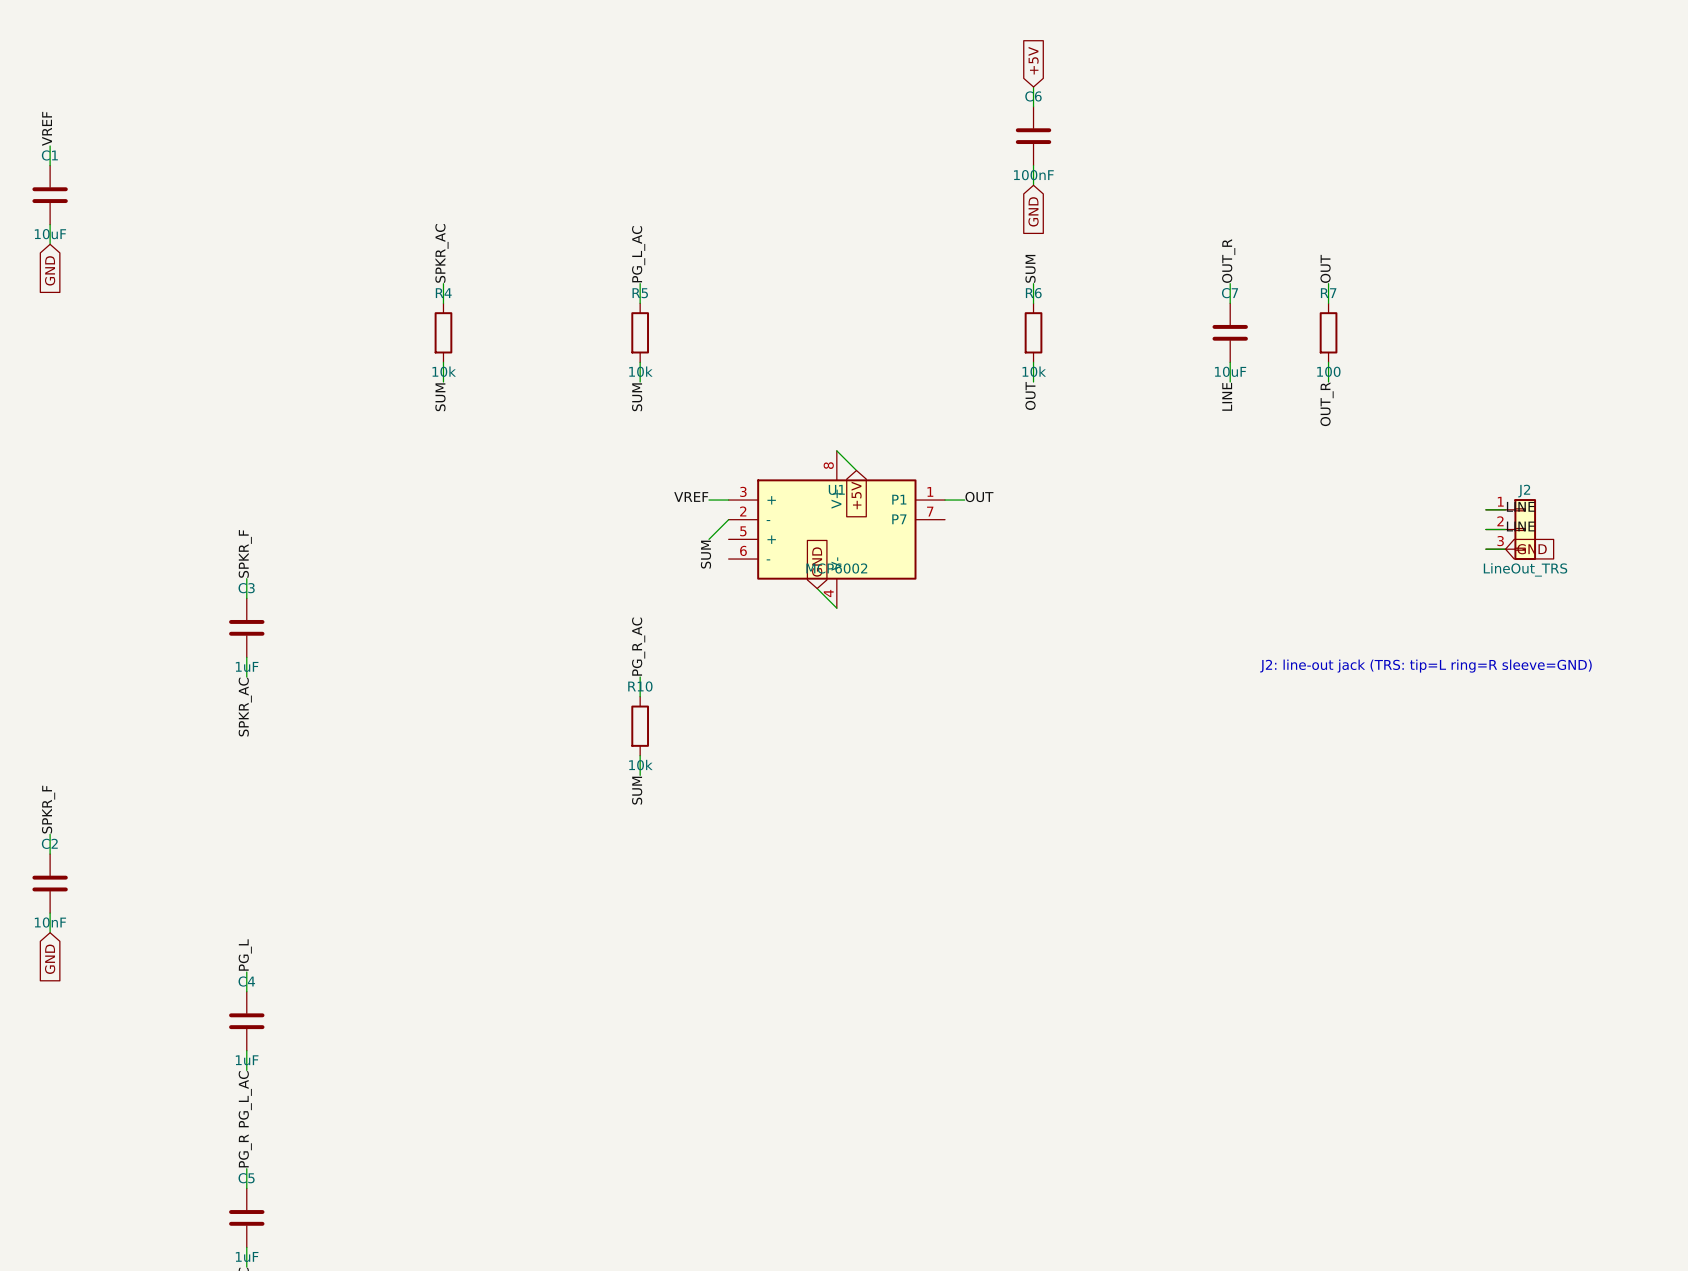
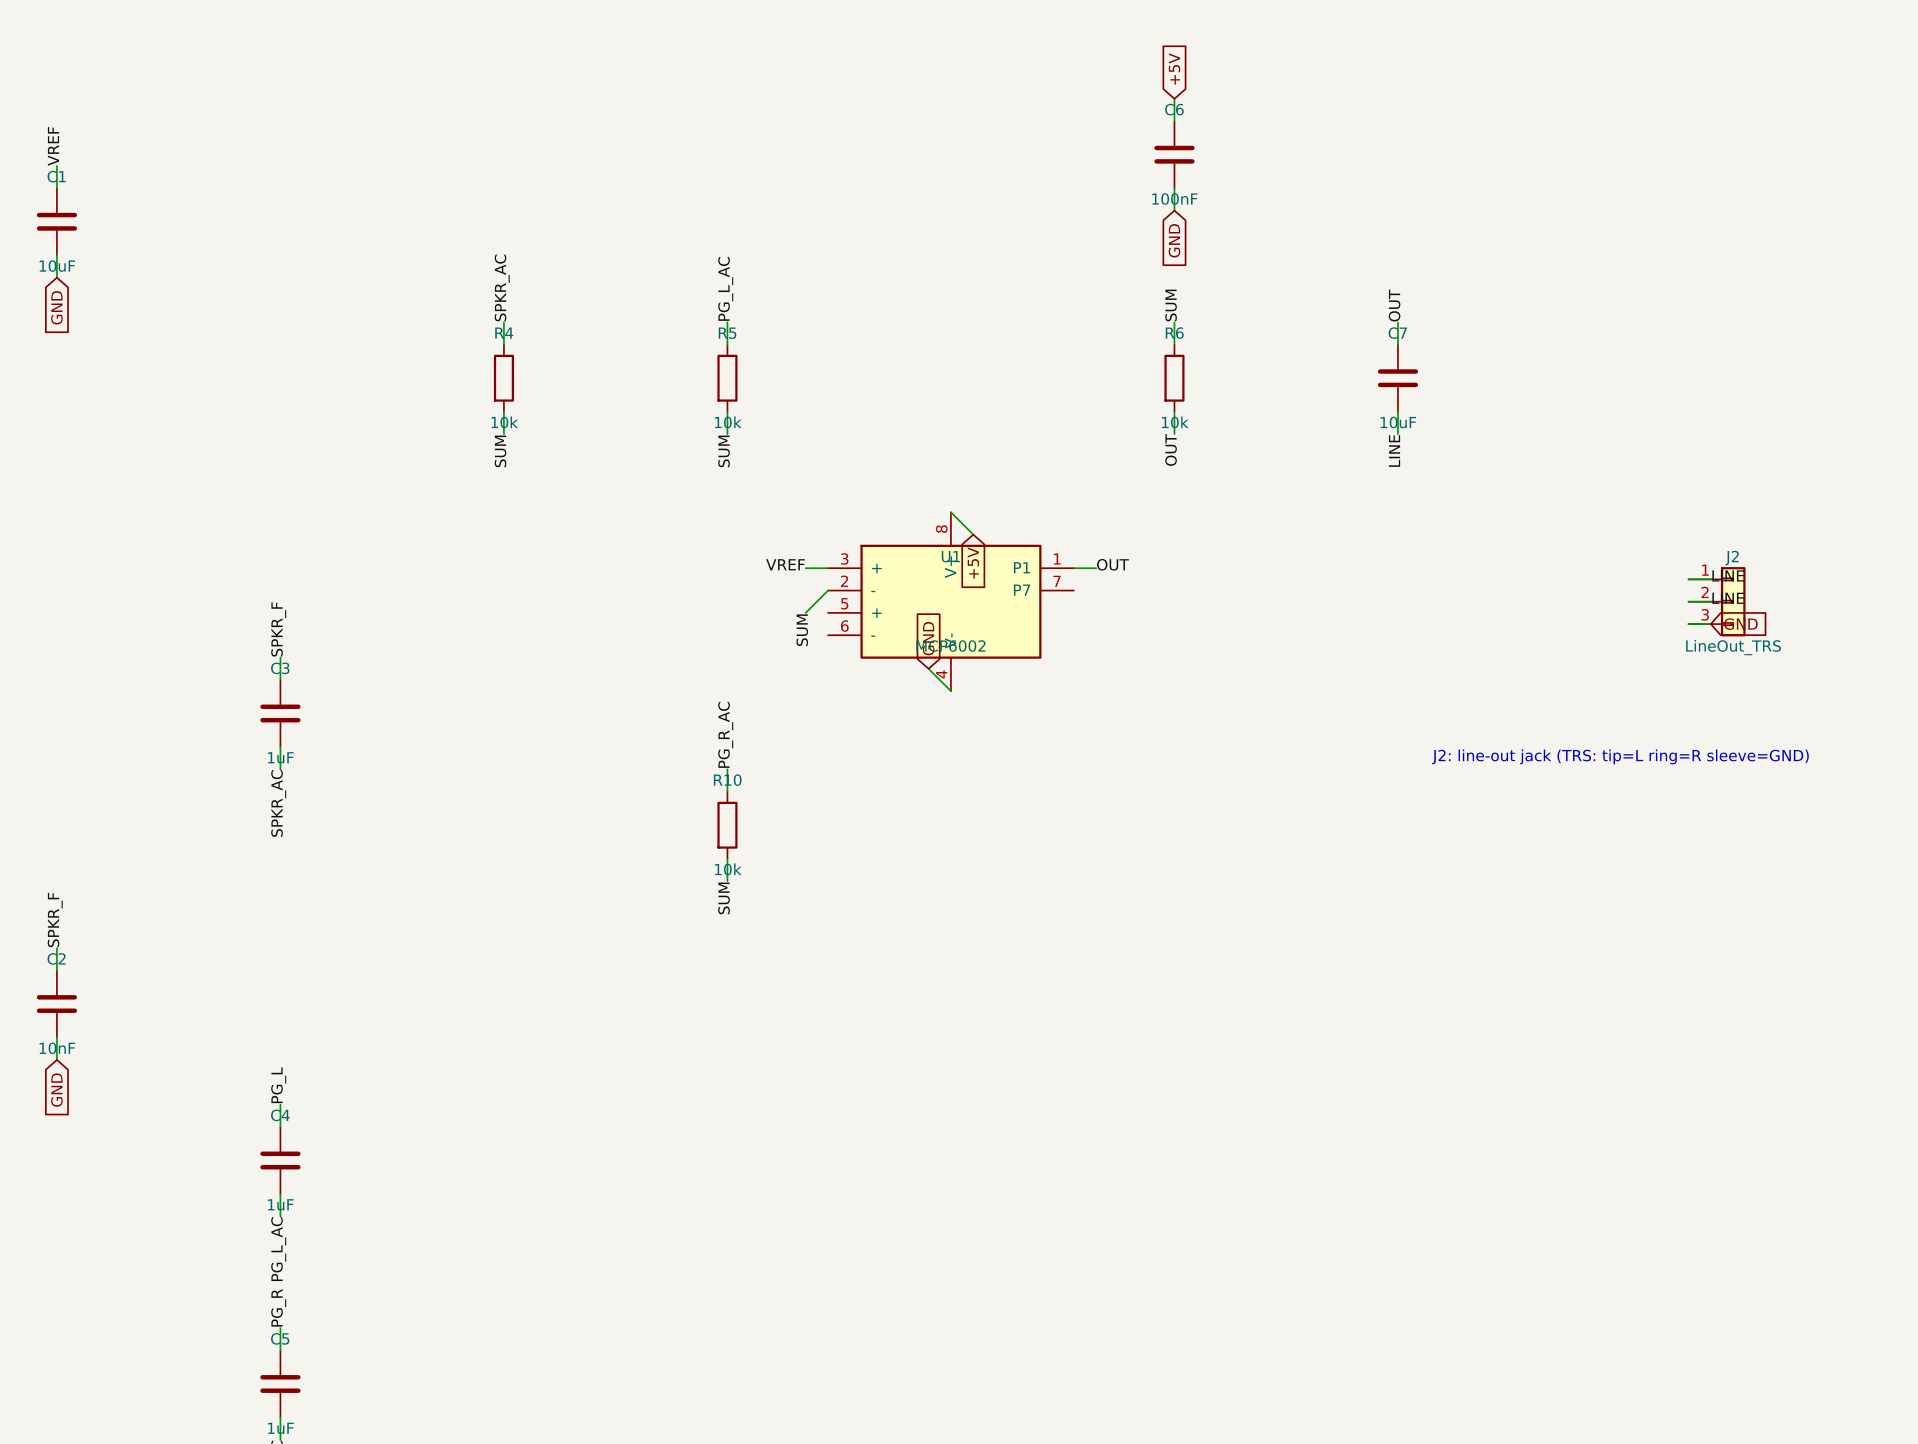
label: OUT_R (1228, 261) -> OUT (1394, 305)
label: OUT (1325, 268) -> none
wire: (1328, 283) (1328, 303) -> none
R7: 100 (1328, 332) -> none
wire: (1328, 362) (1328, 382) -> none
label: OUT_R (1327, 404) -> none

